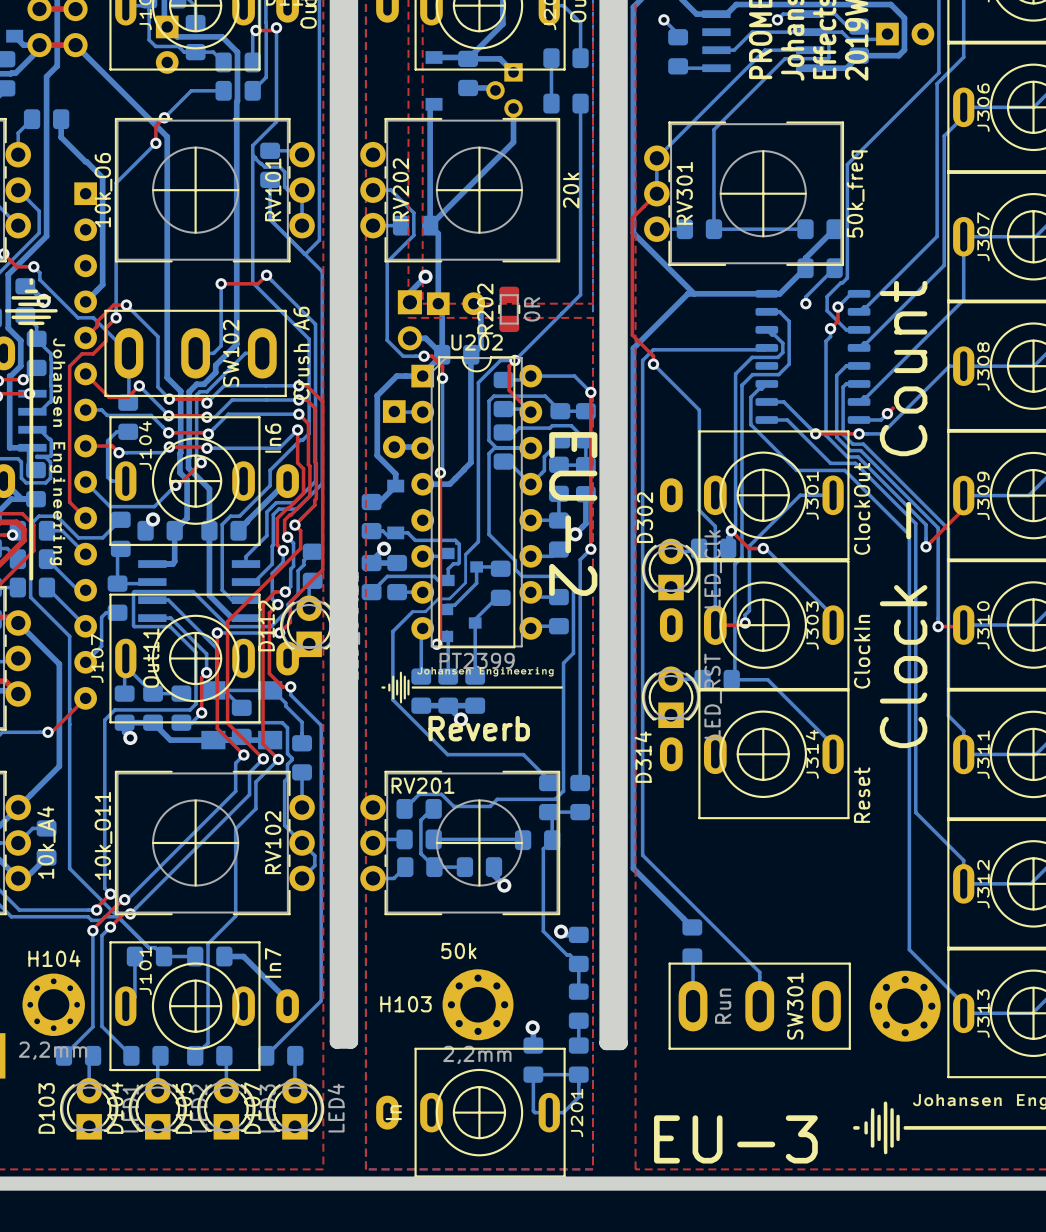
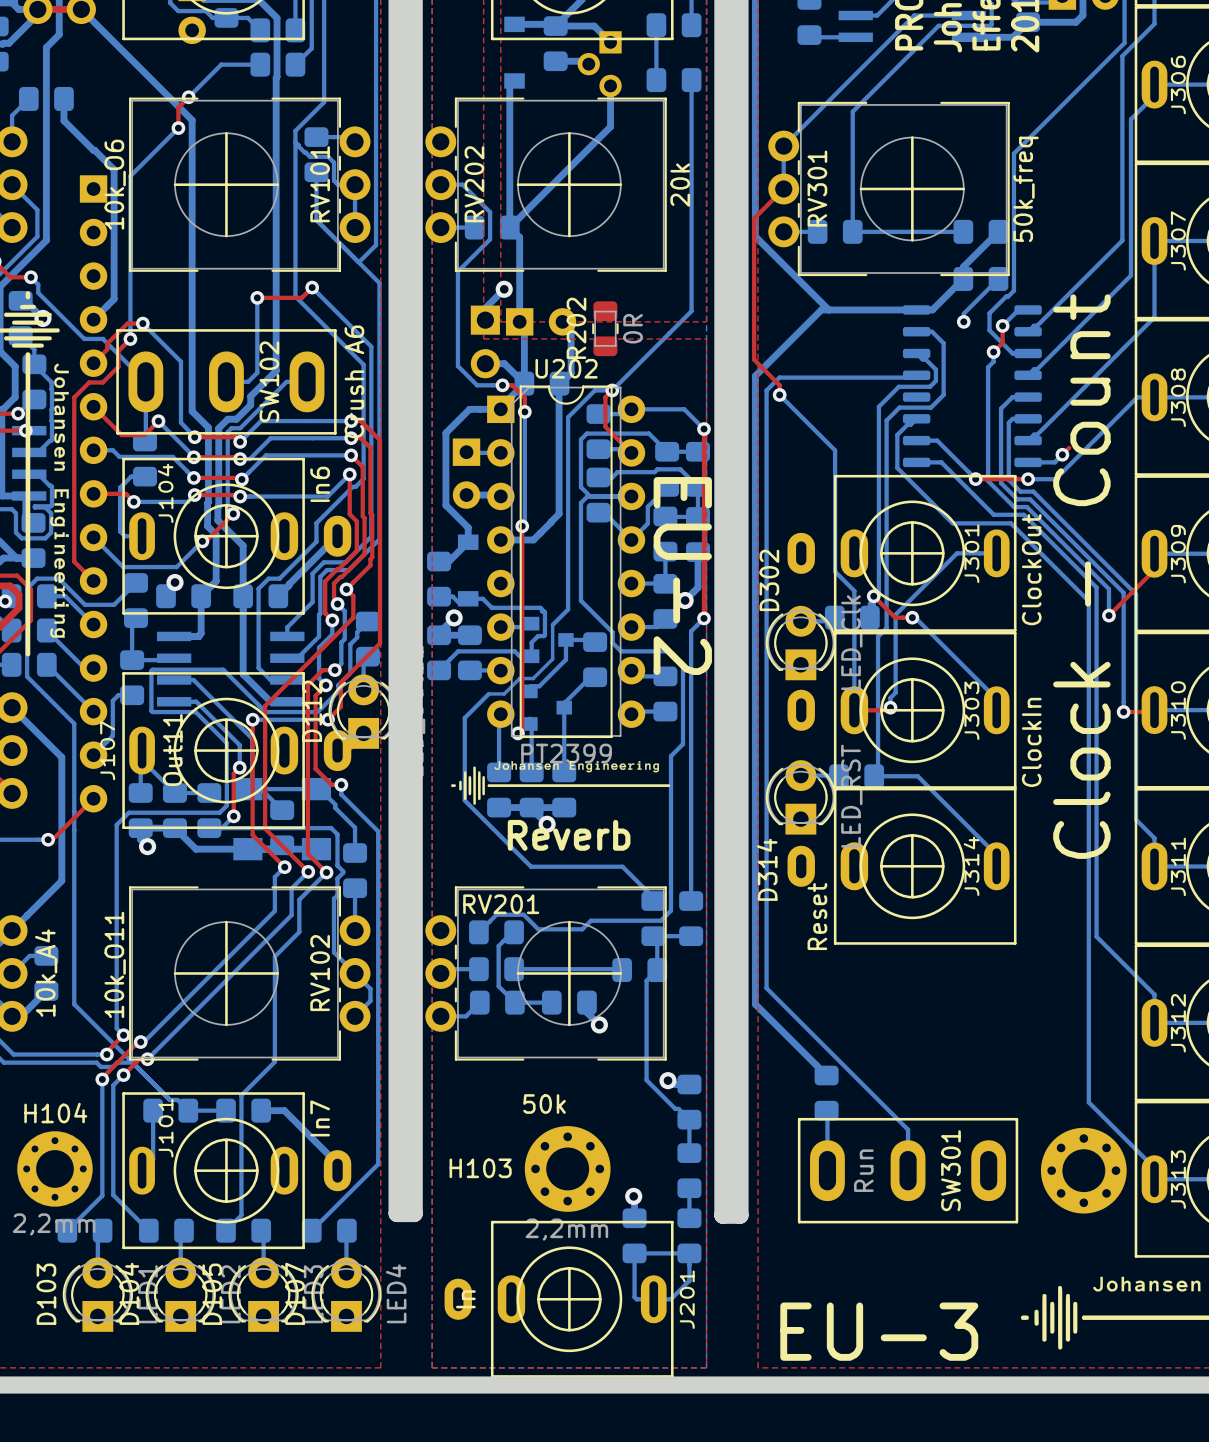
J314 value position: Reset (862, 795) -> Reset (817, 916)

